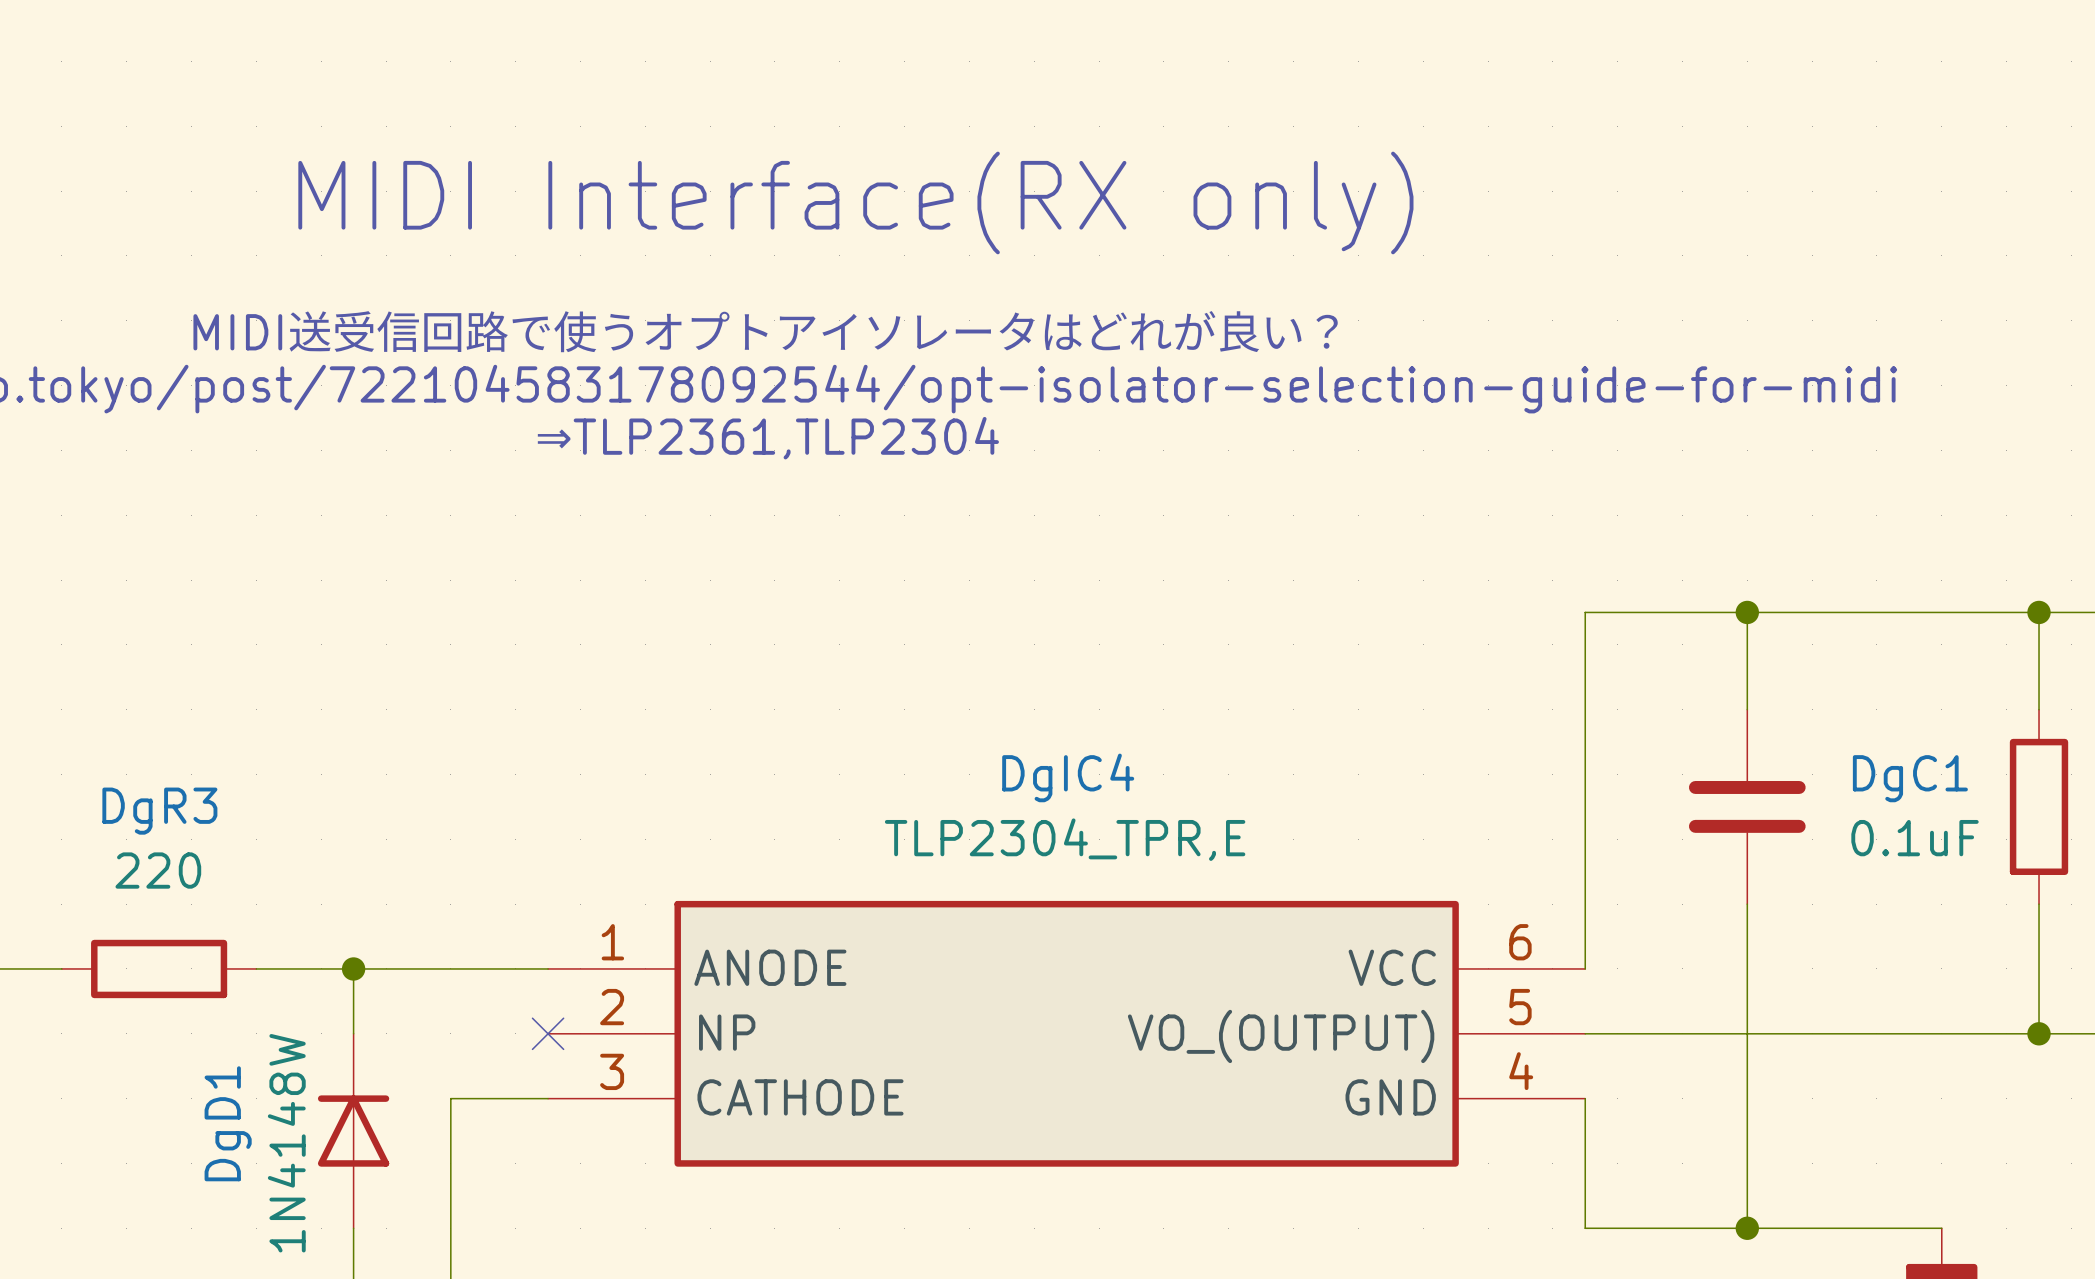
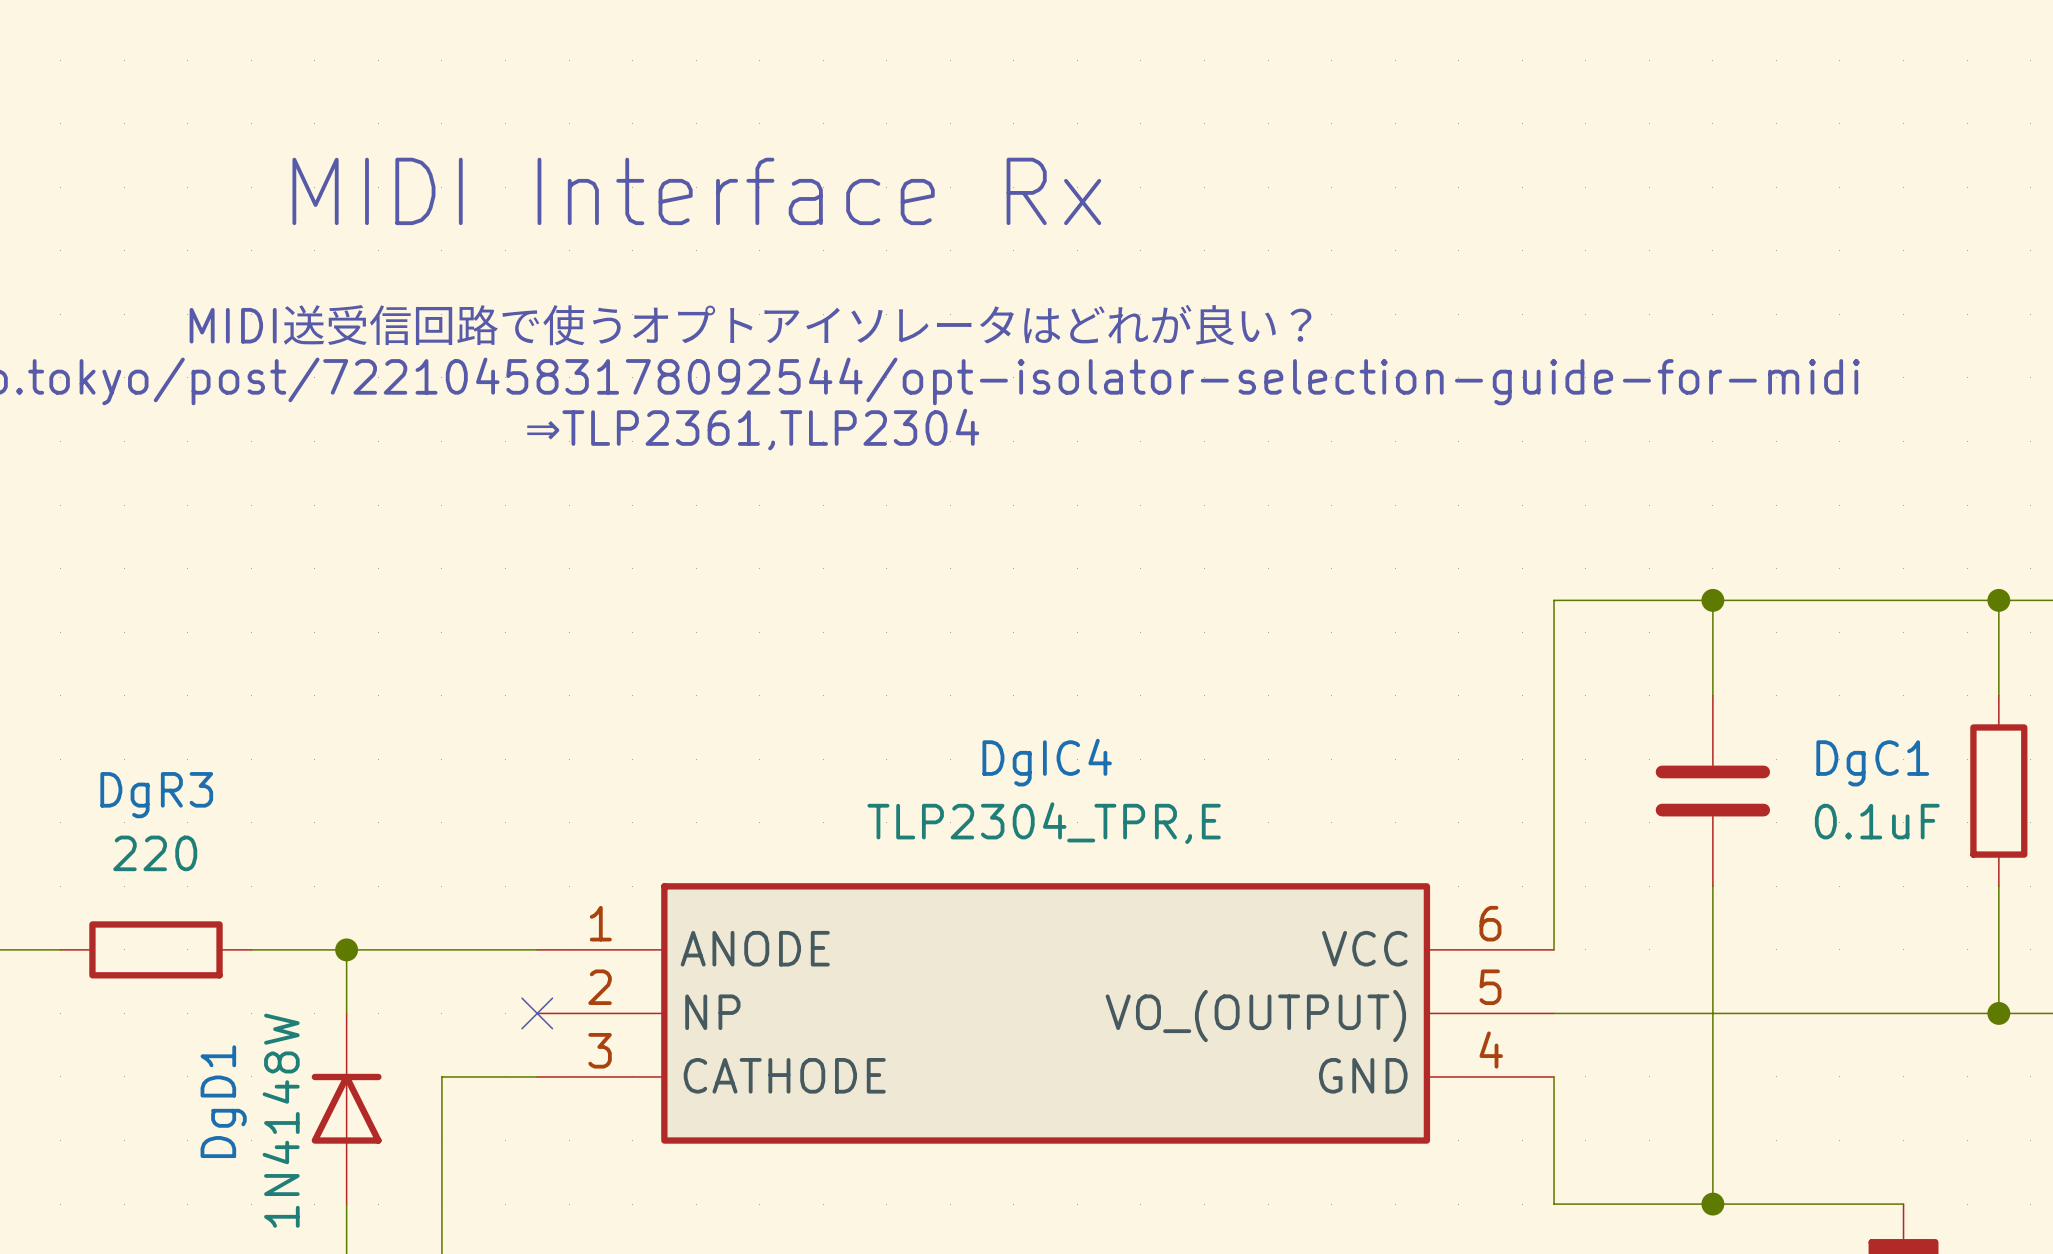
text: MIDI Interface(RX only) (855, 202) -> MIDI Interface Rx (696, 191)

